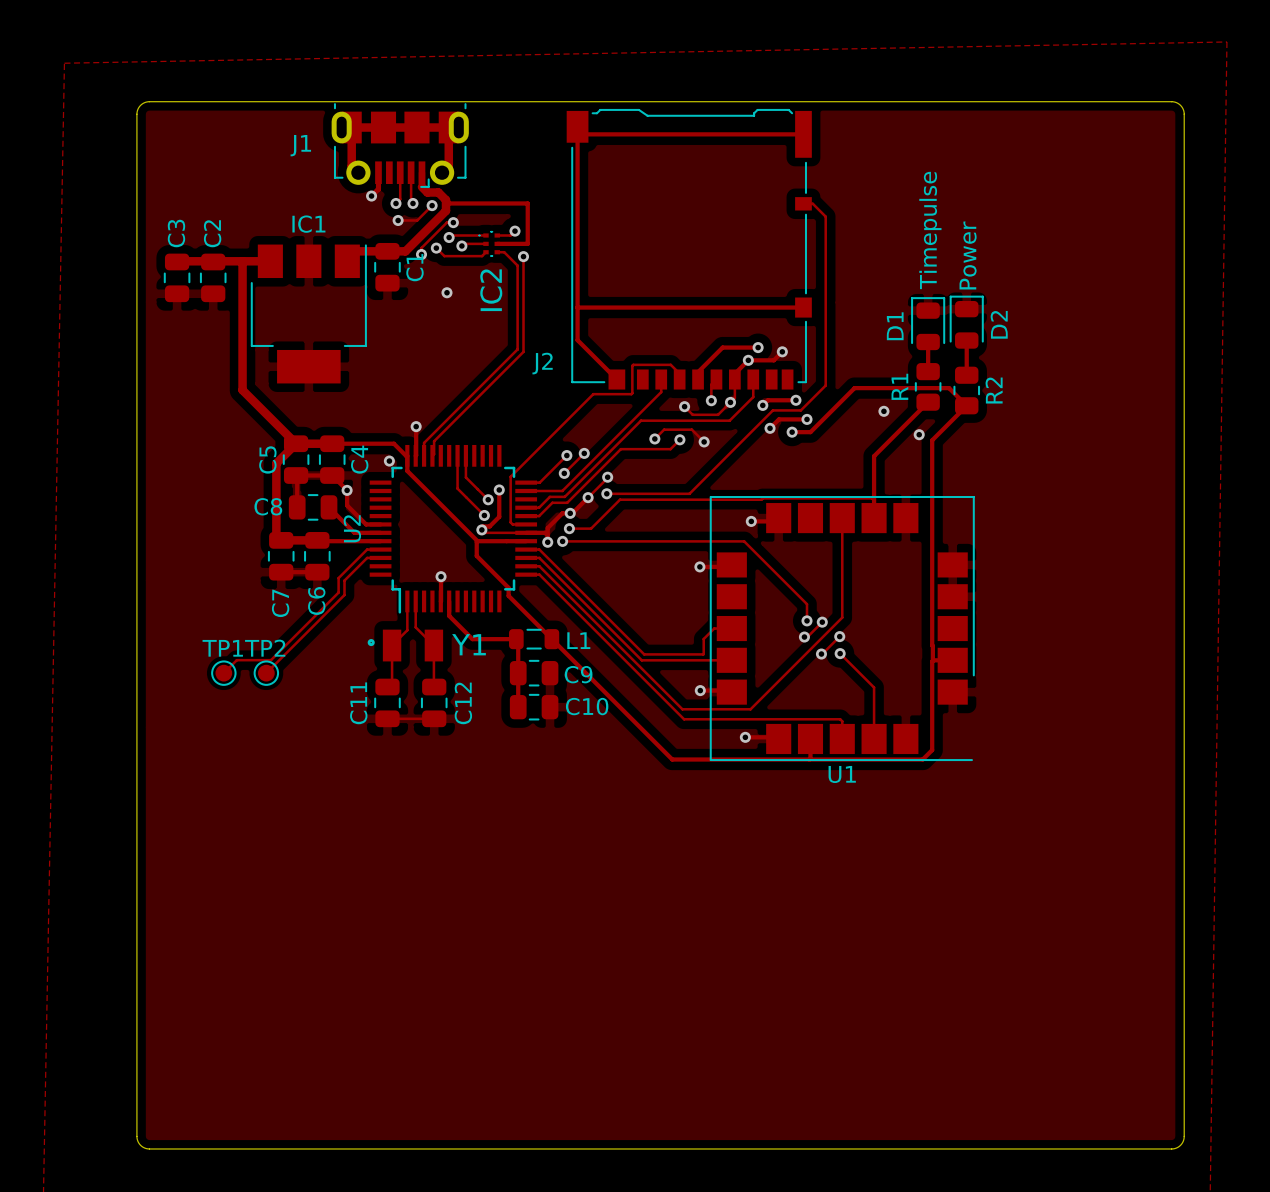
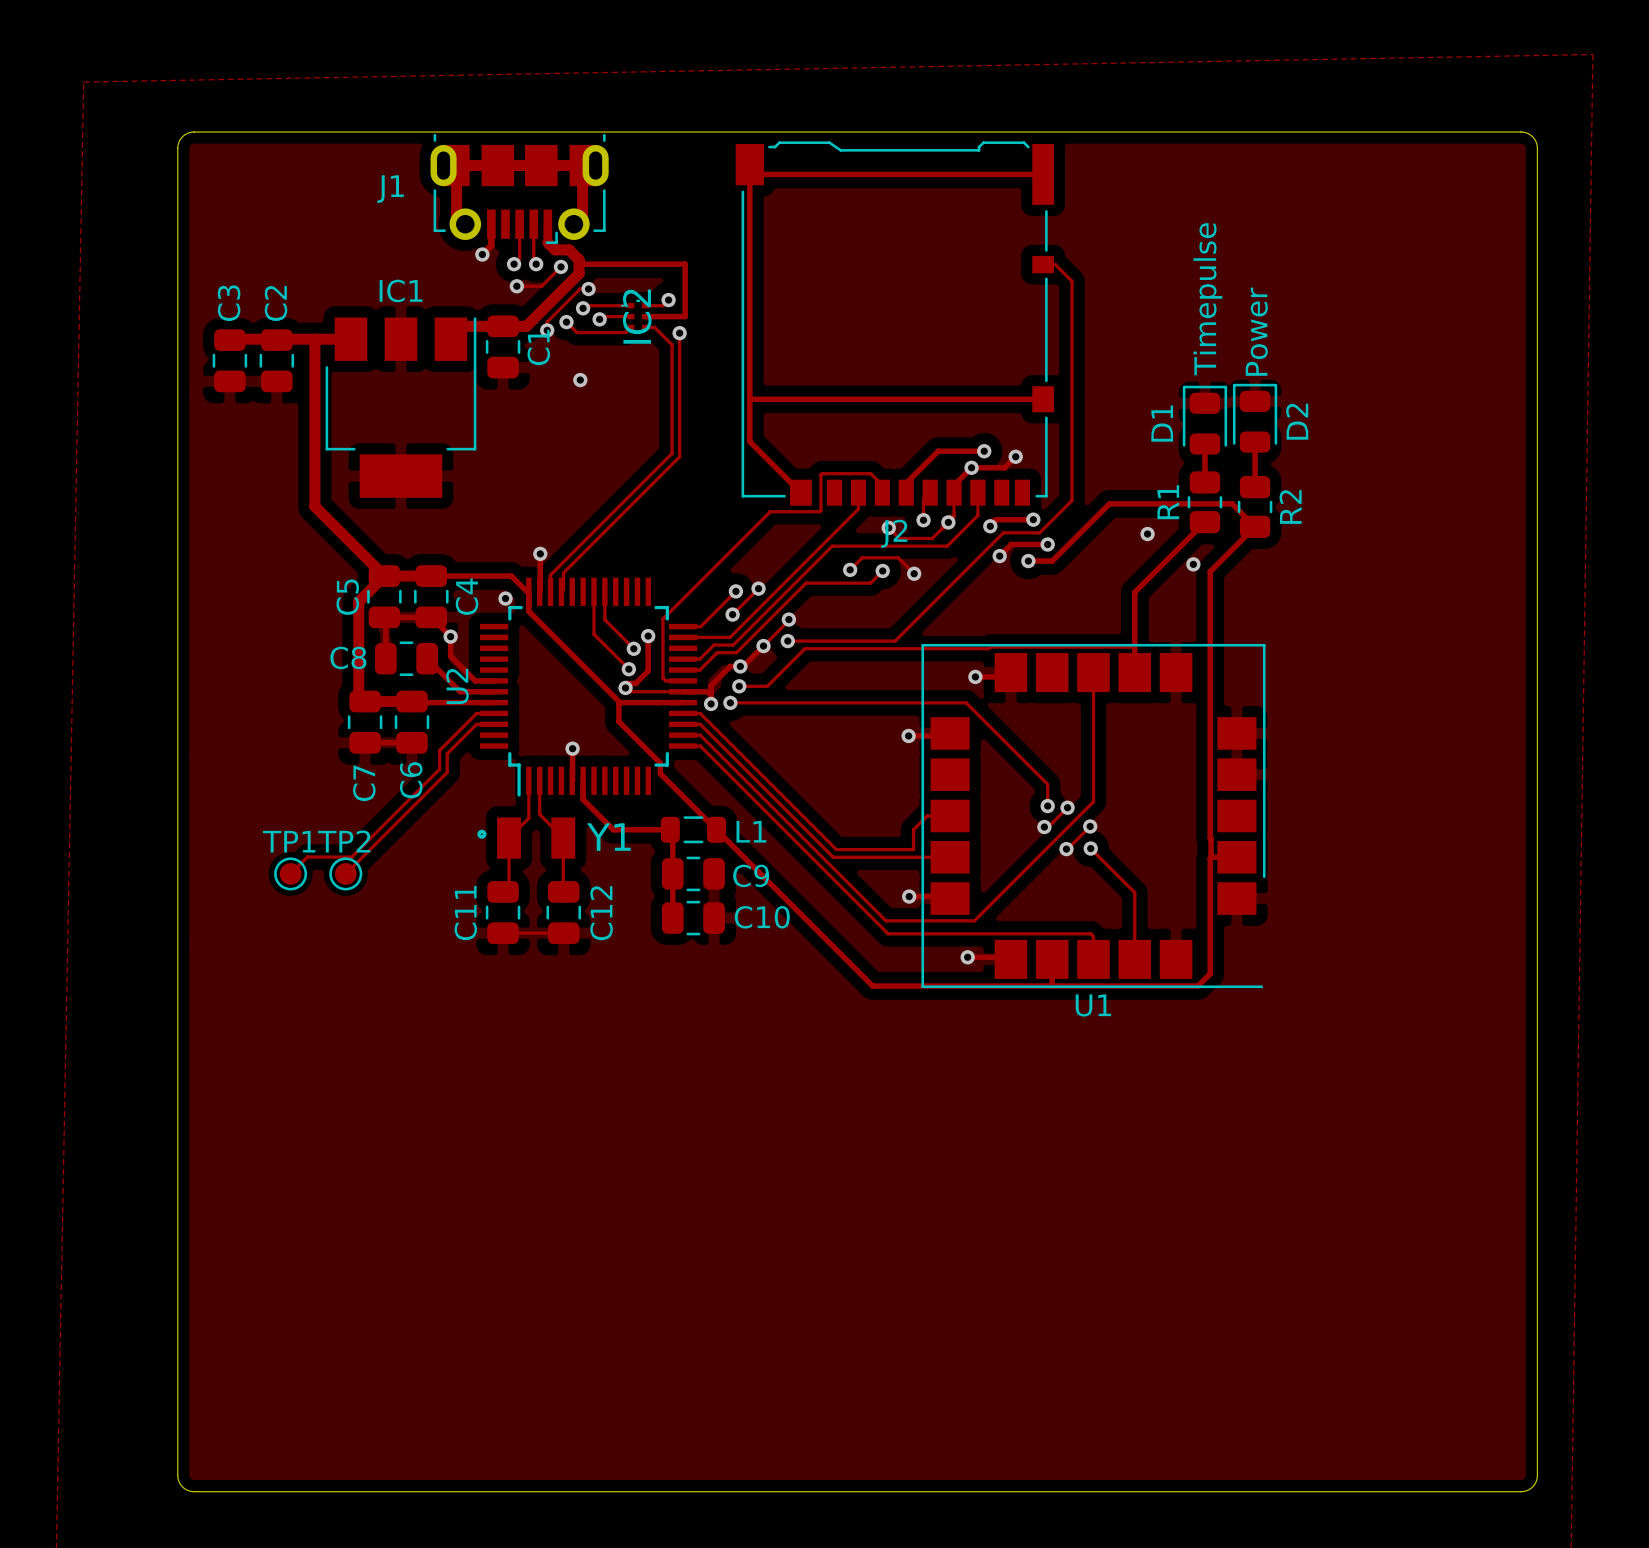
IC2 name position: IC2 (491, 290) -> IC2 (637, 316)
J2 name position: J2 (542, 363) -> J2 (894, 533)

